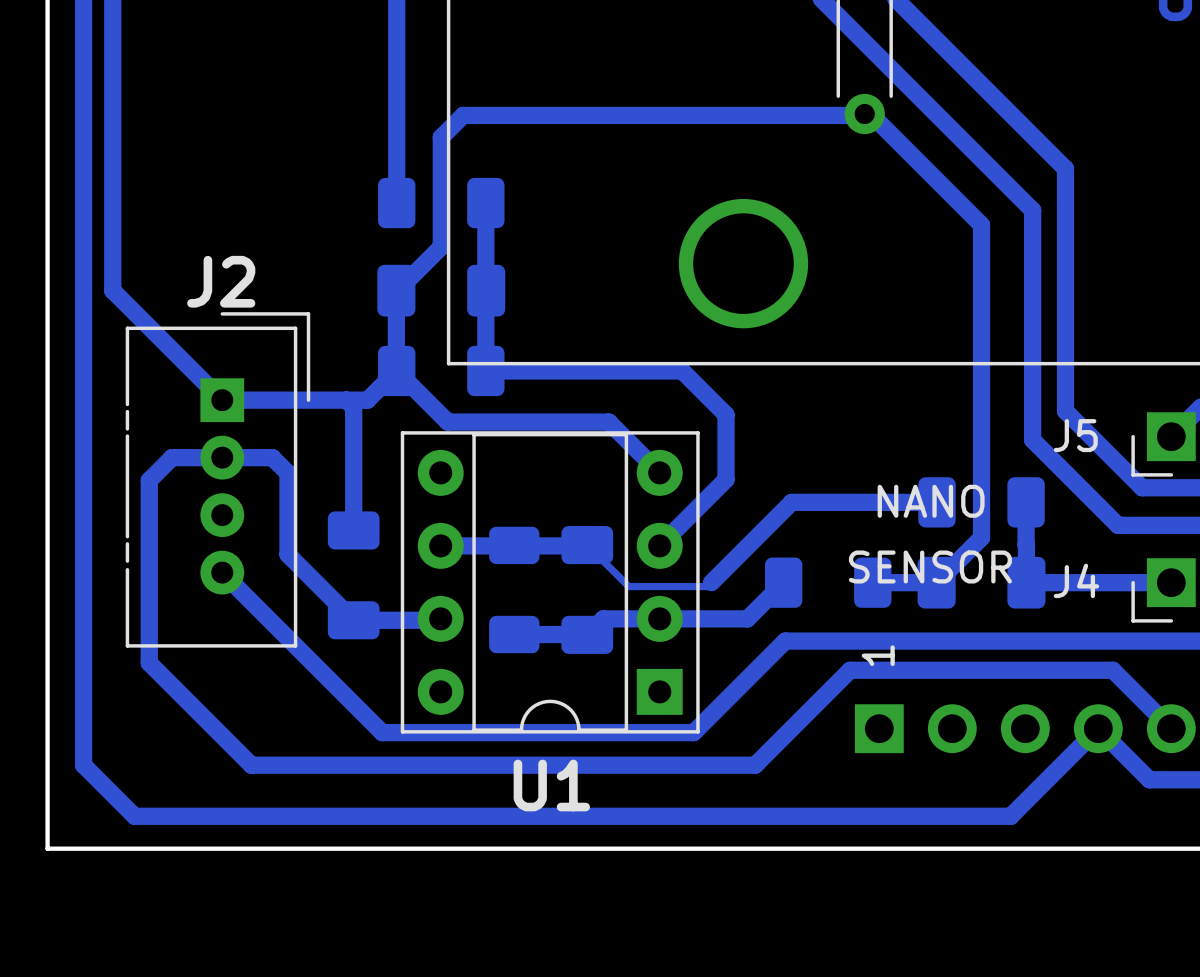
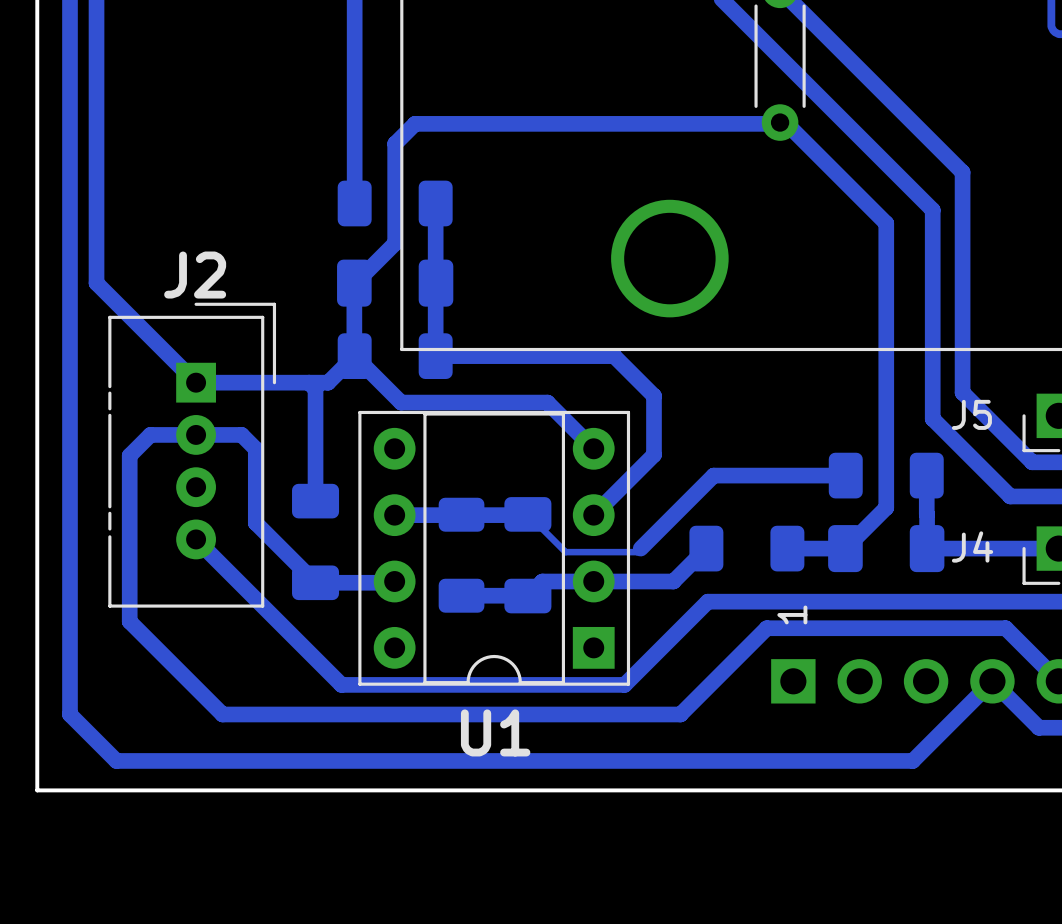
text: NANO (931, 501) -> none
text: SENSOR (930, 567) -> none

